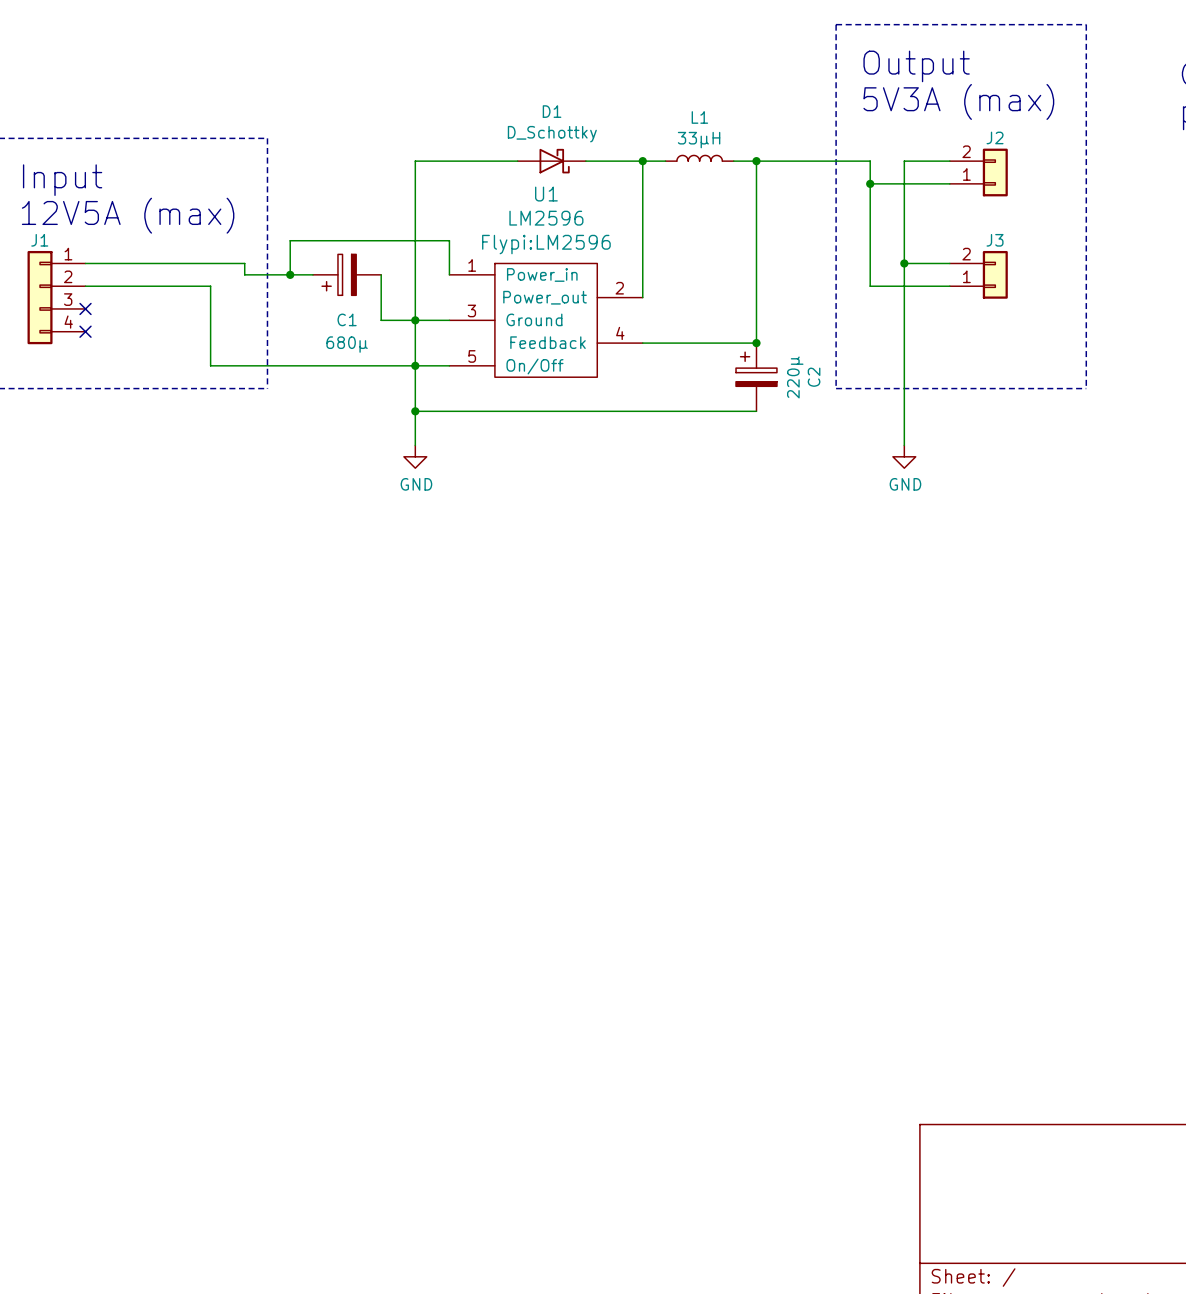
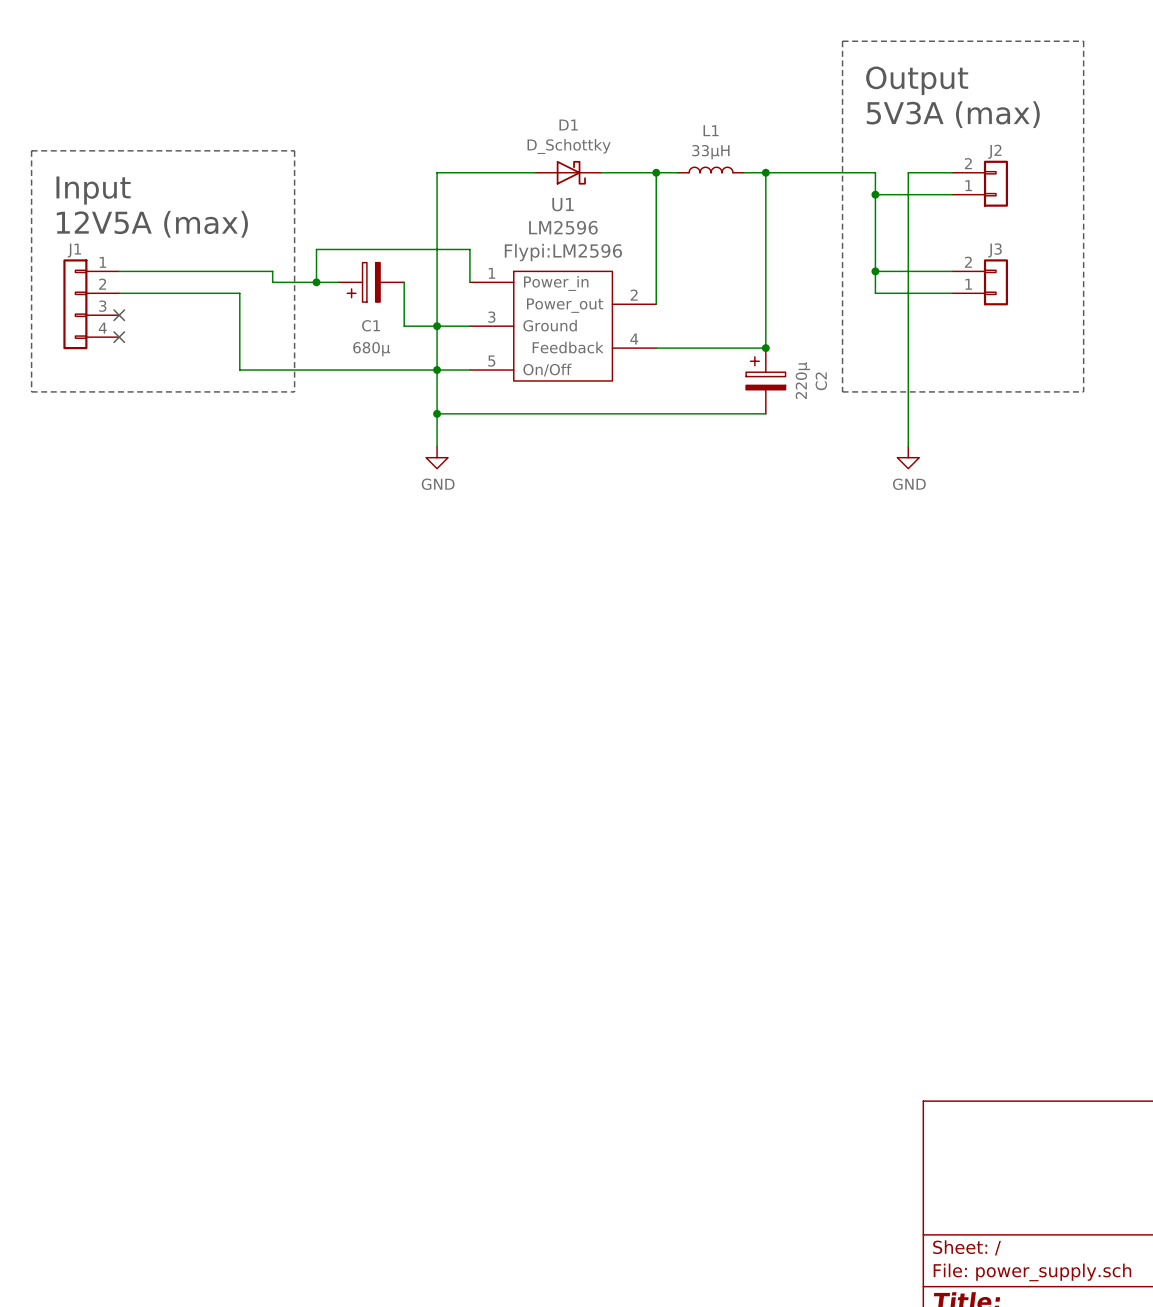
wire: none -> (875, 271) (908, 271)
junction position: (904, 263) -> (875, 271)

